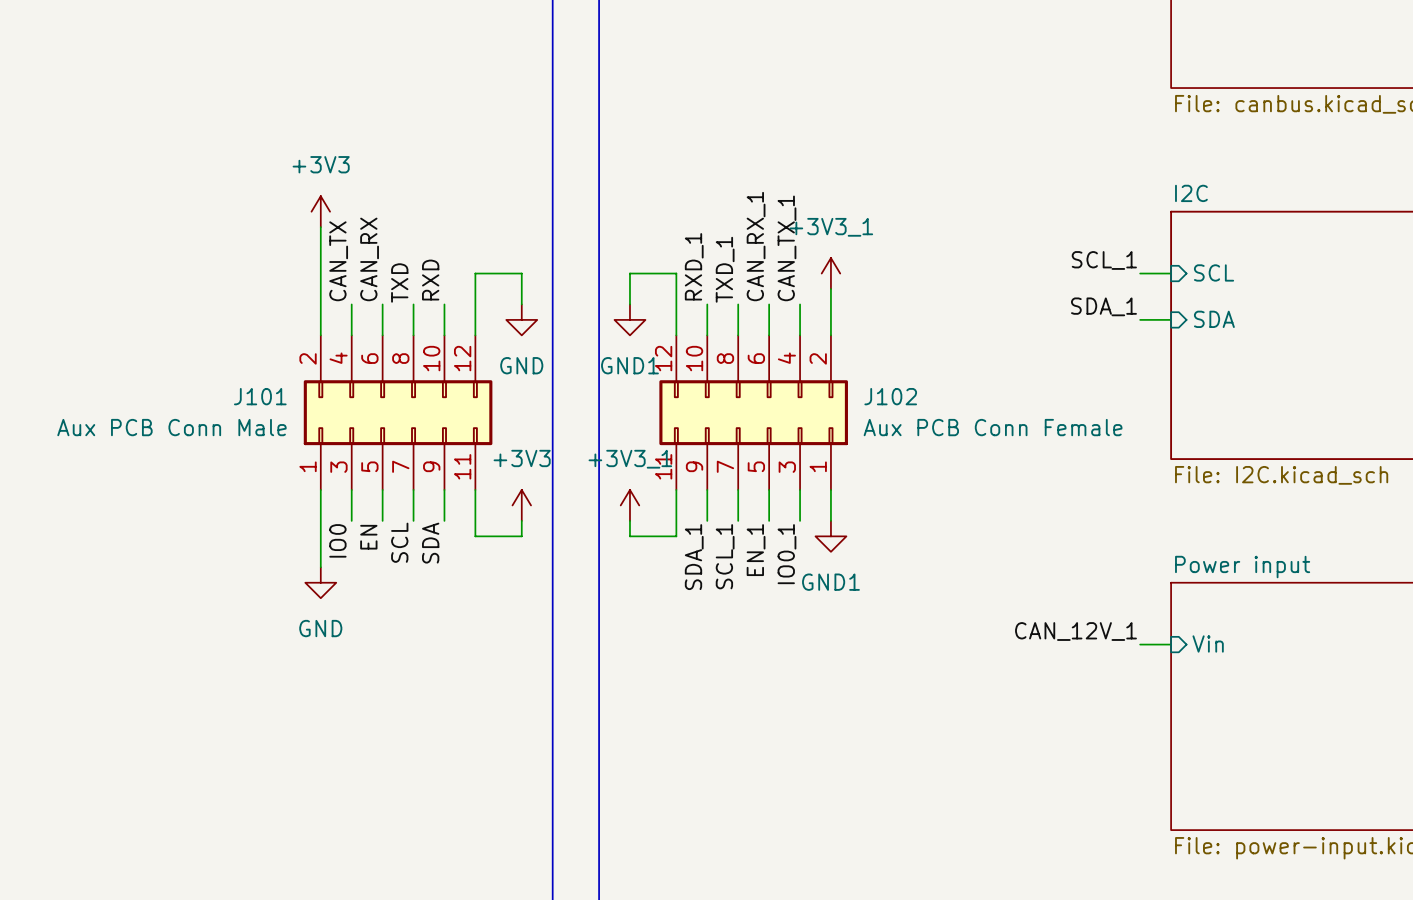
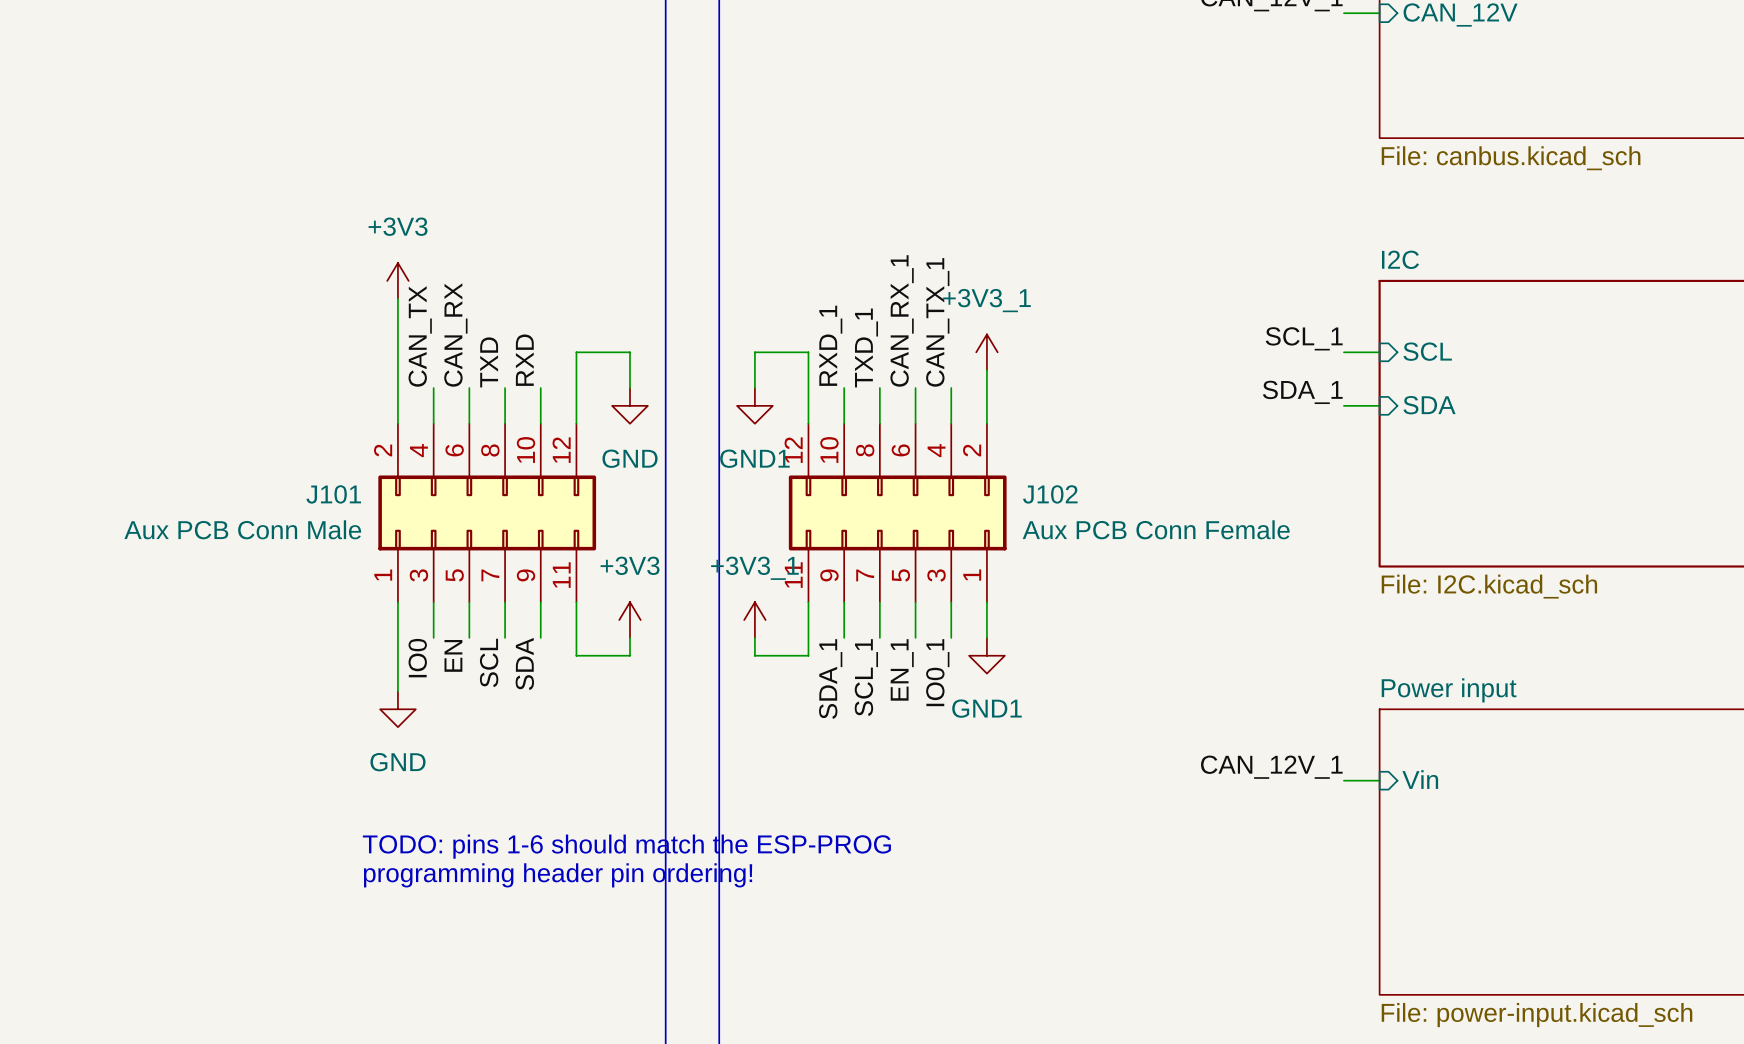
text: none -> TODO: pins 1-6 should match the ESP-PROG (626, 846)
text: none -> programming header pin ordering! (558, 875)

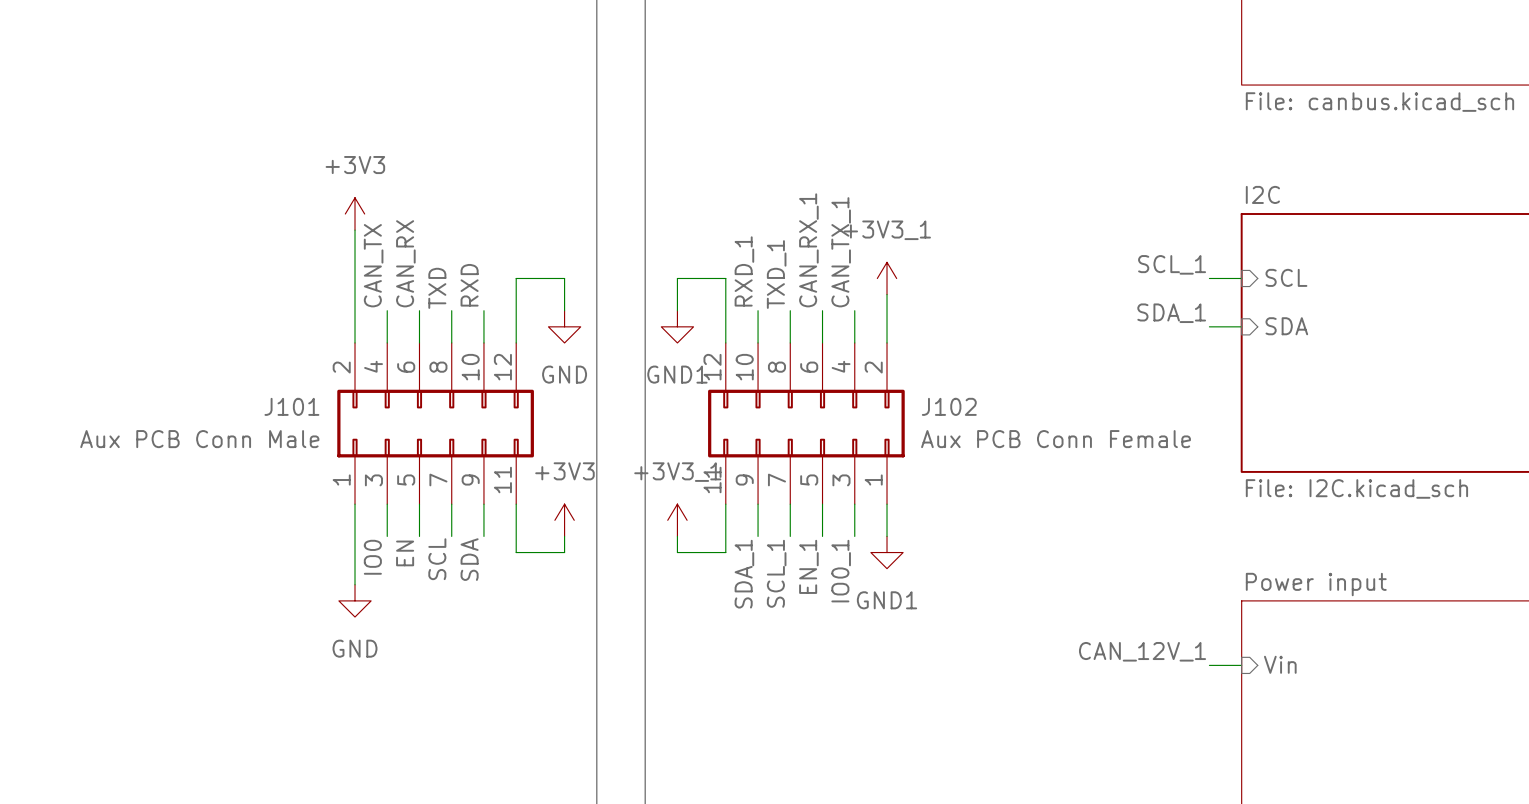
text: TODO: pins 1-6 should match the ESP-PROG (626, 846) -> none
text: programming header pin ordering! (558, 875) -> none

